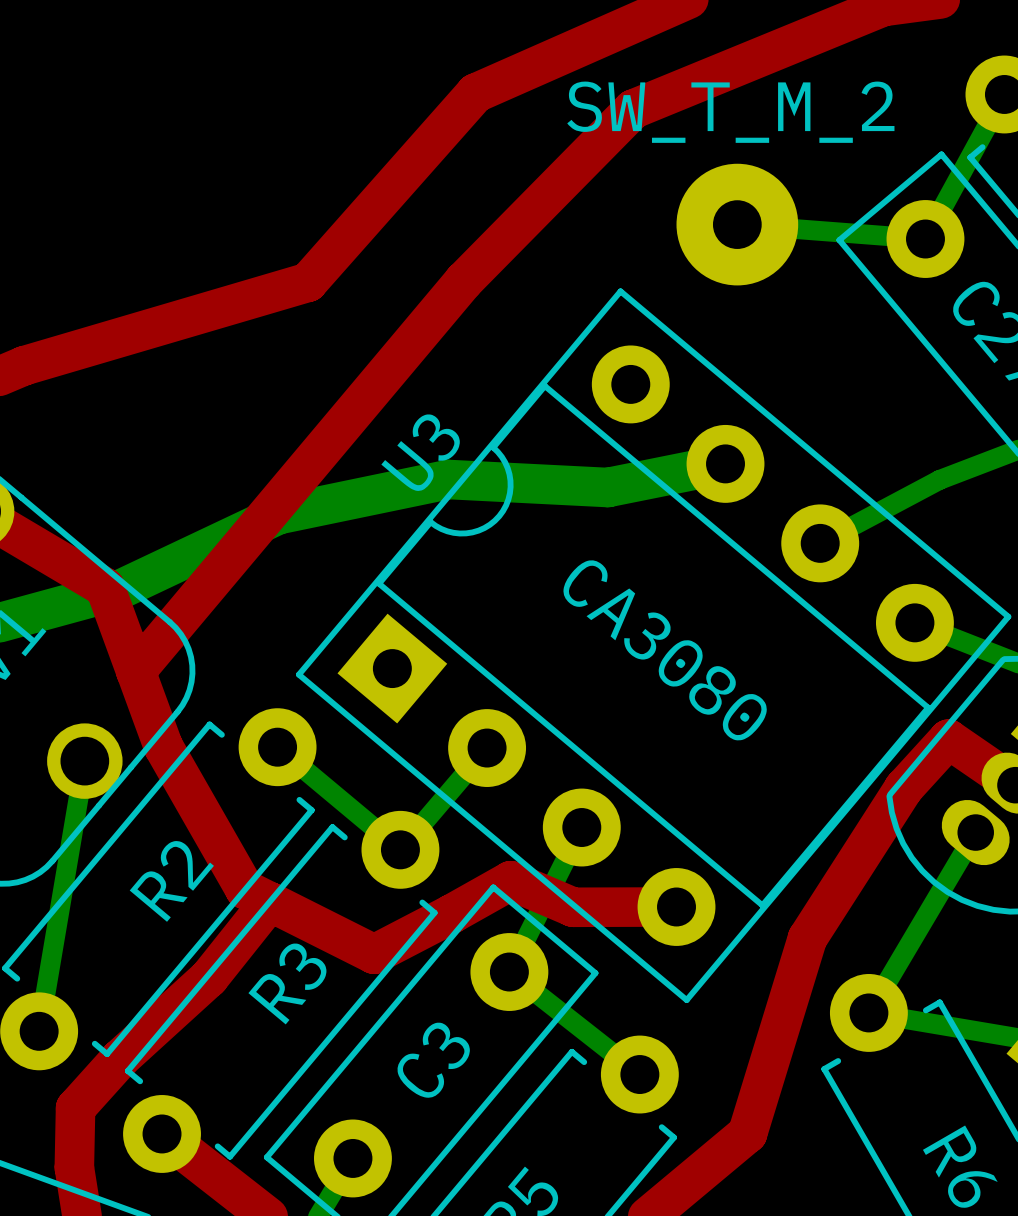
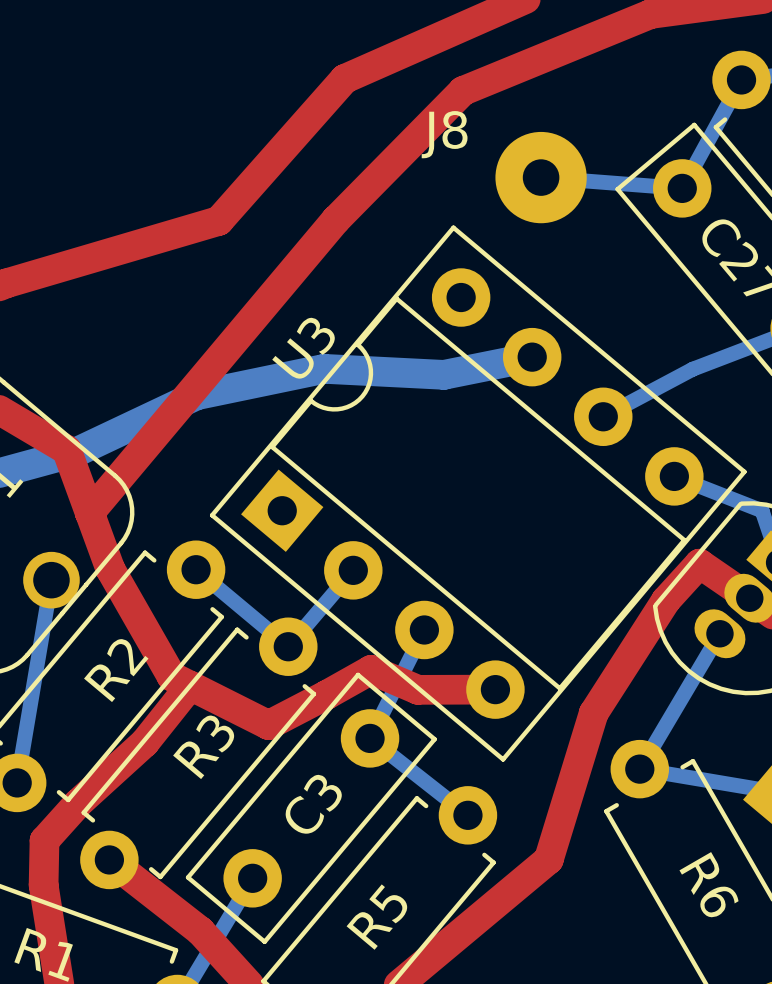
text: SW_T_M_2 (730, 112) -> none
J8 name: none -> J8 (444, 134)
text: CA3080 (664, 649) -> none

